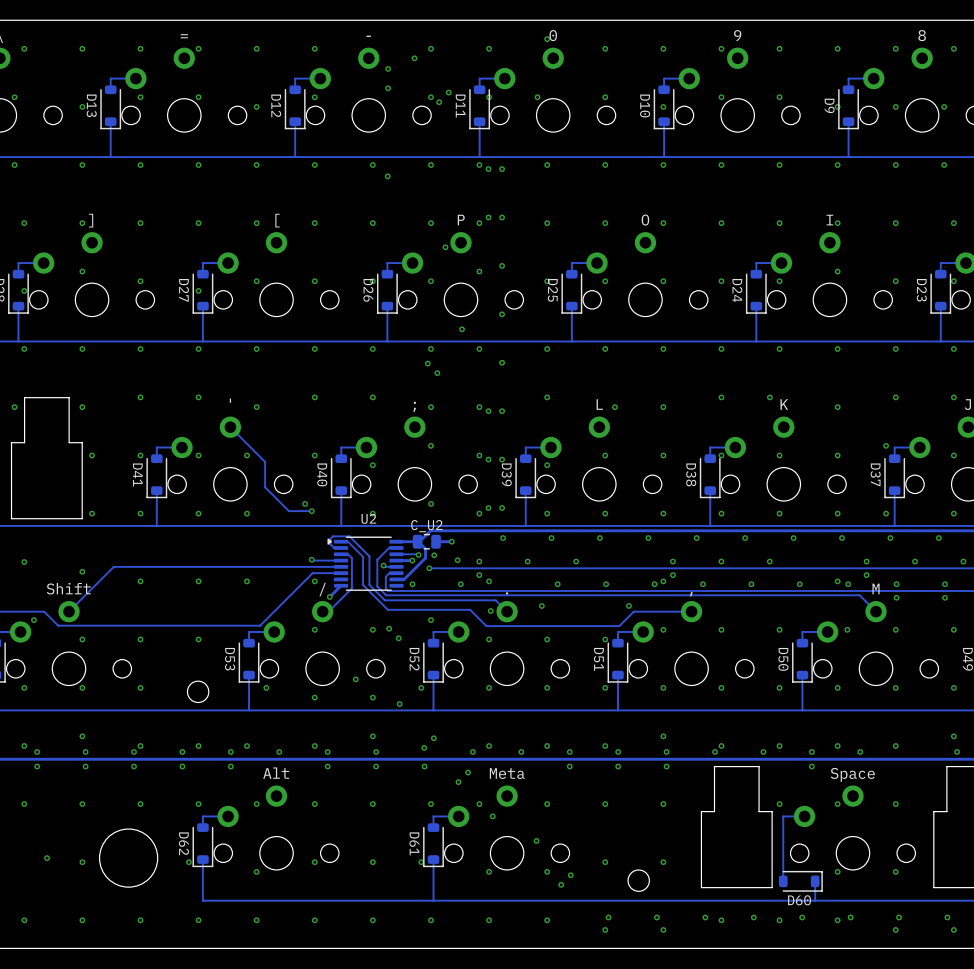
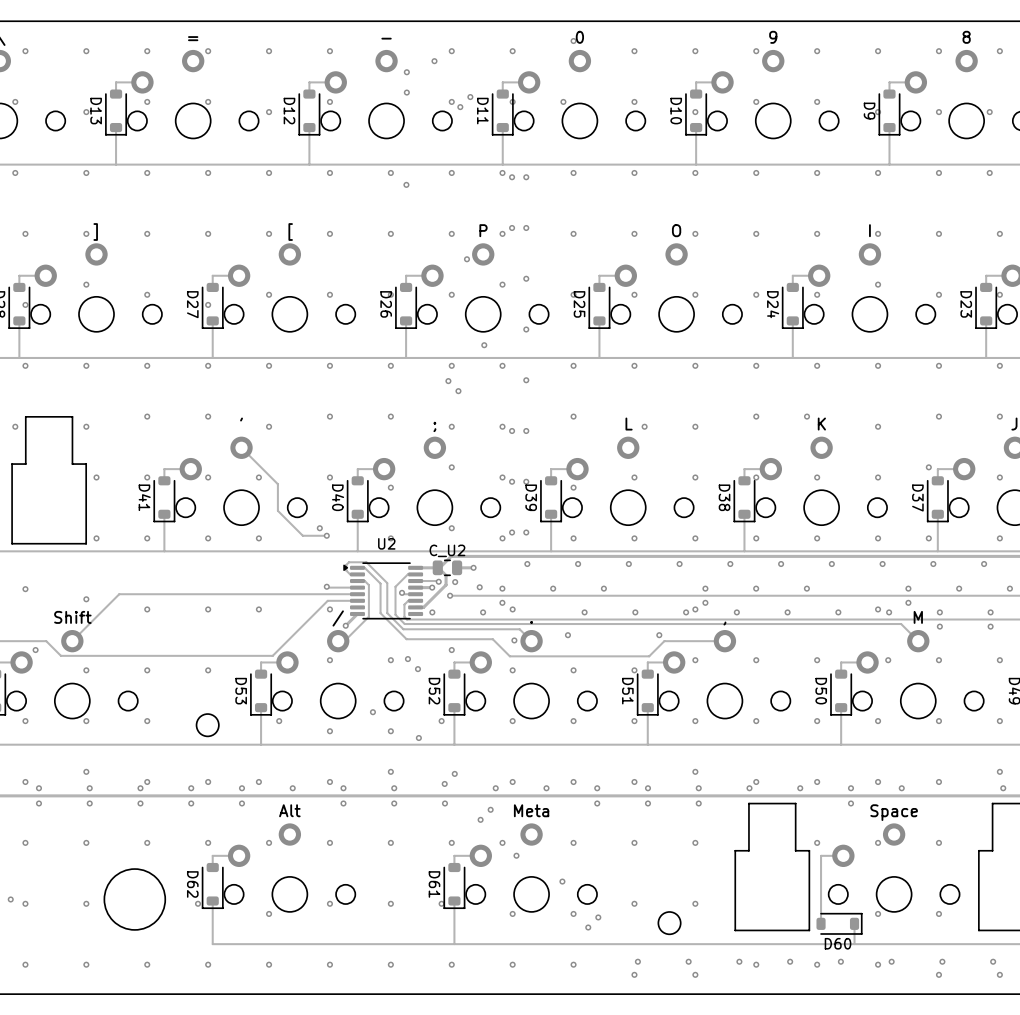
via: none -> (10, 899)
via: (47, 858) -> none
via: none -> (25, 903)

